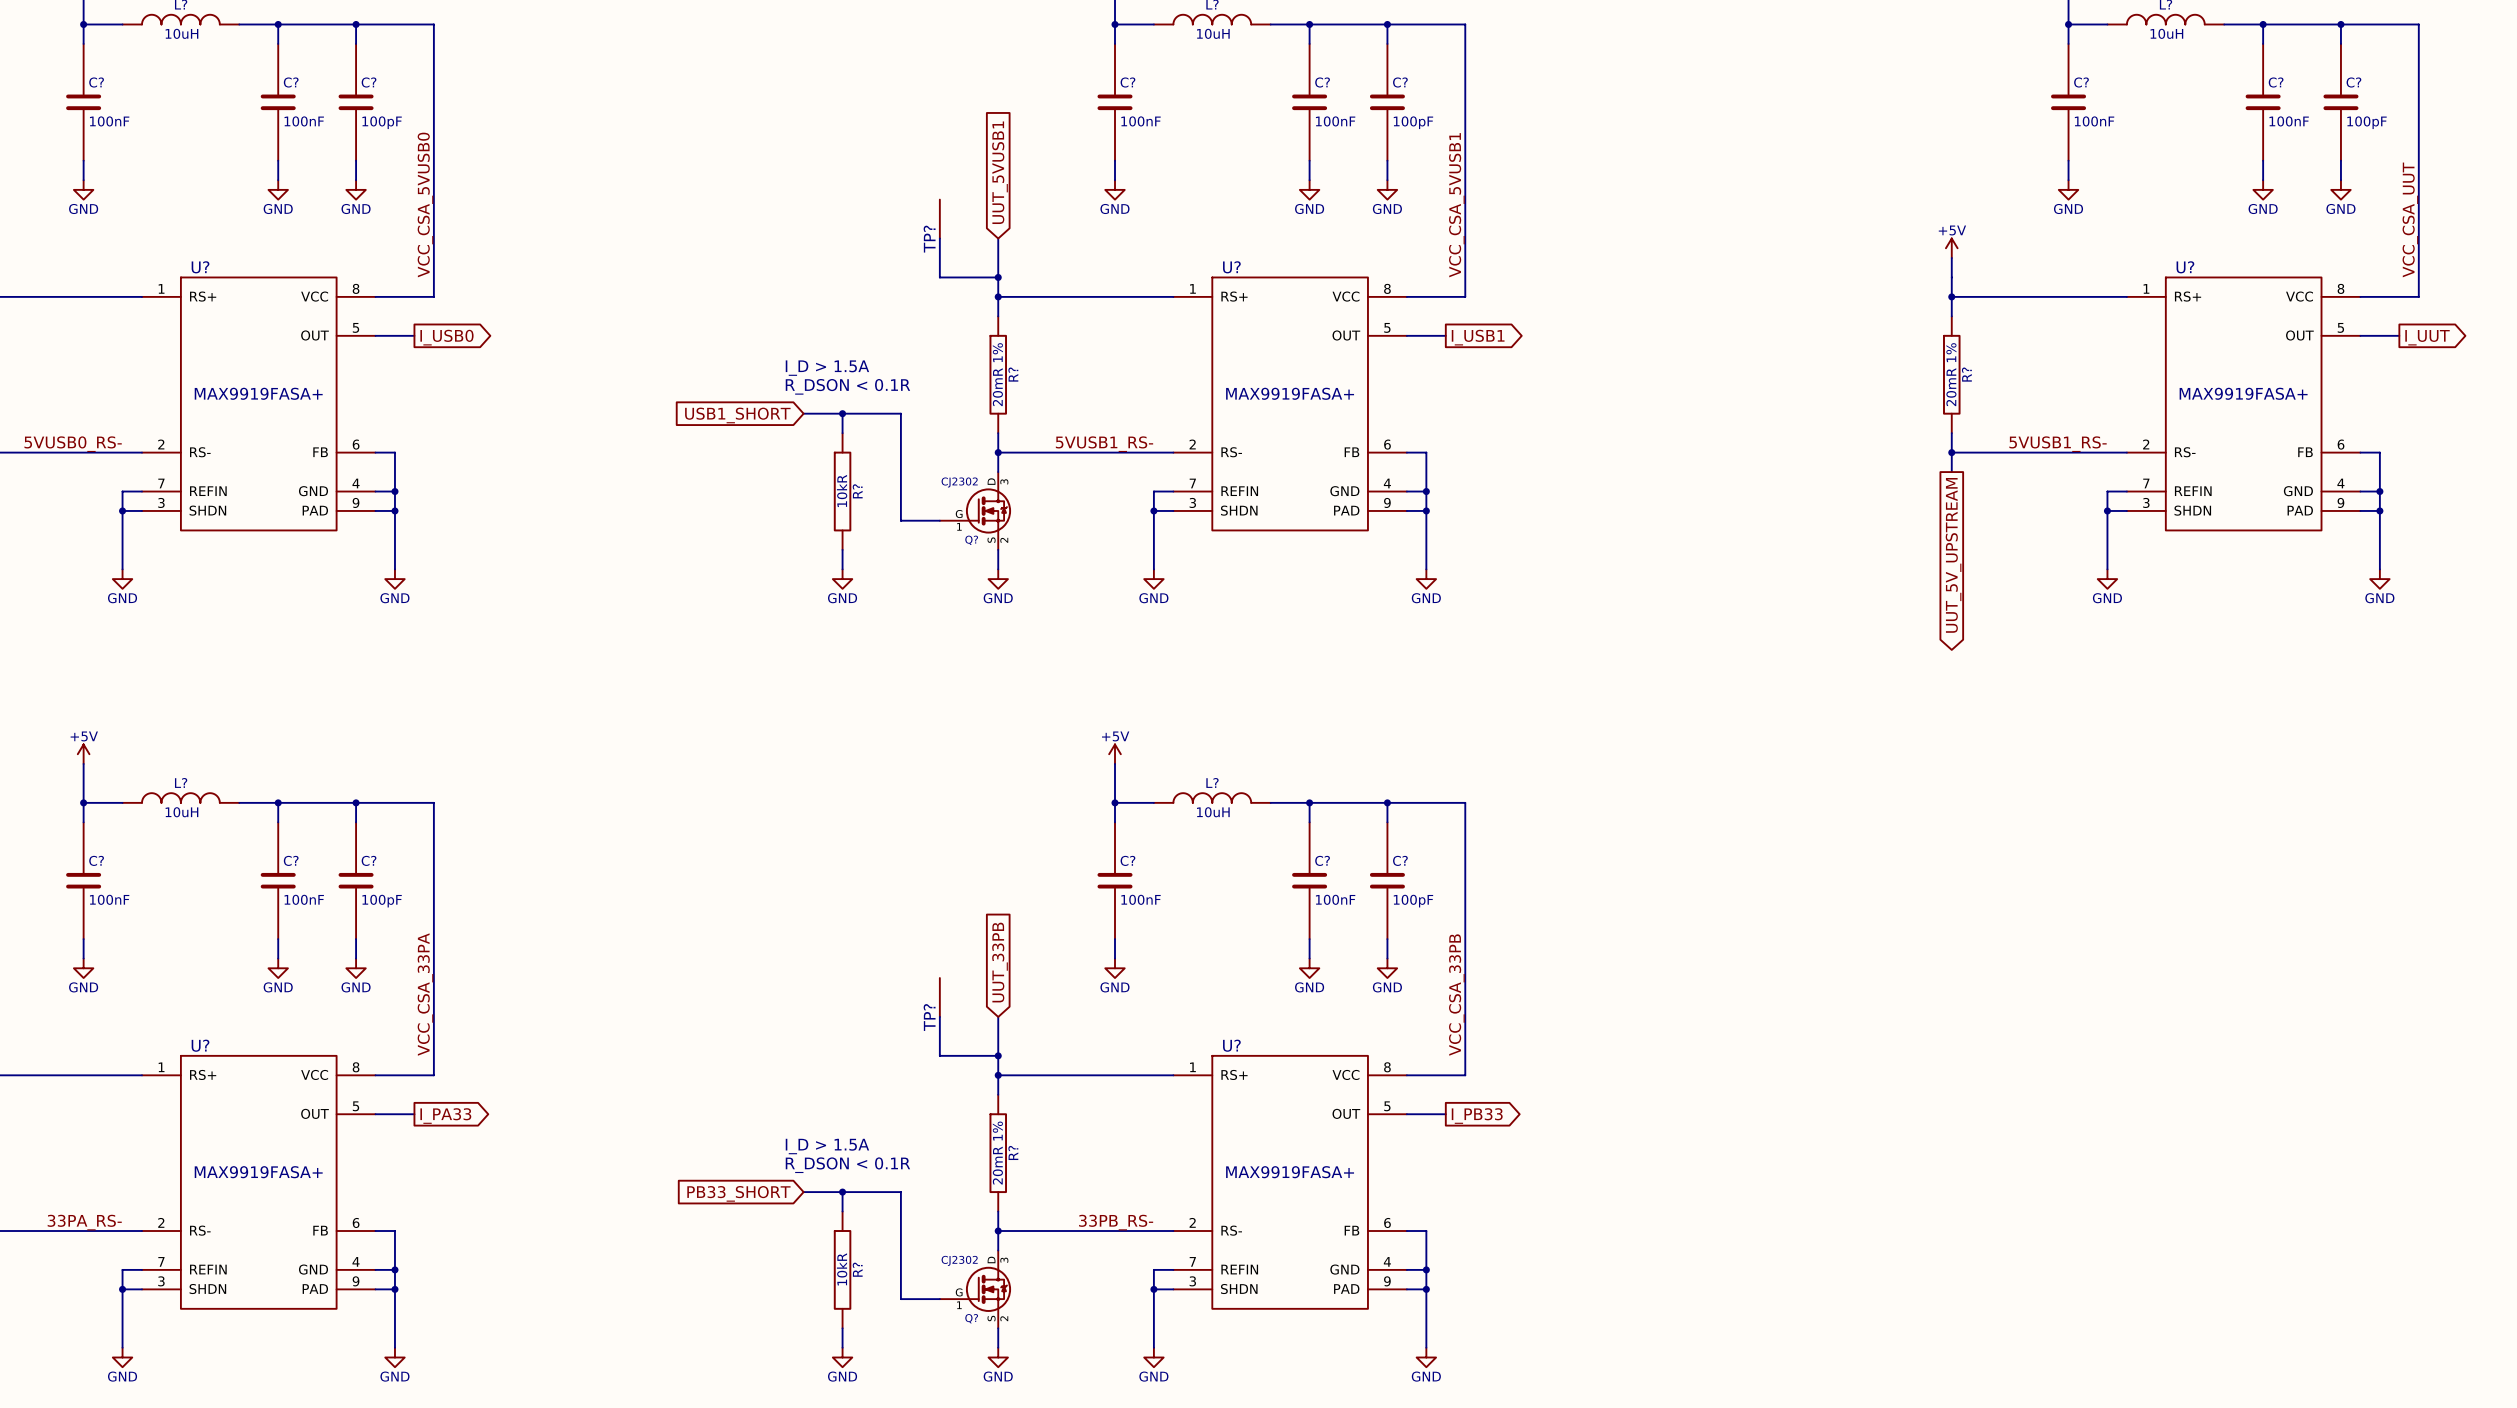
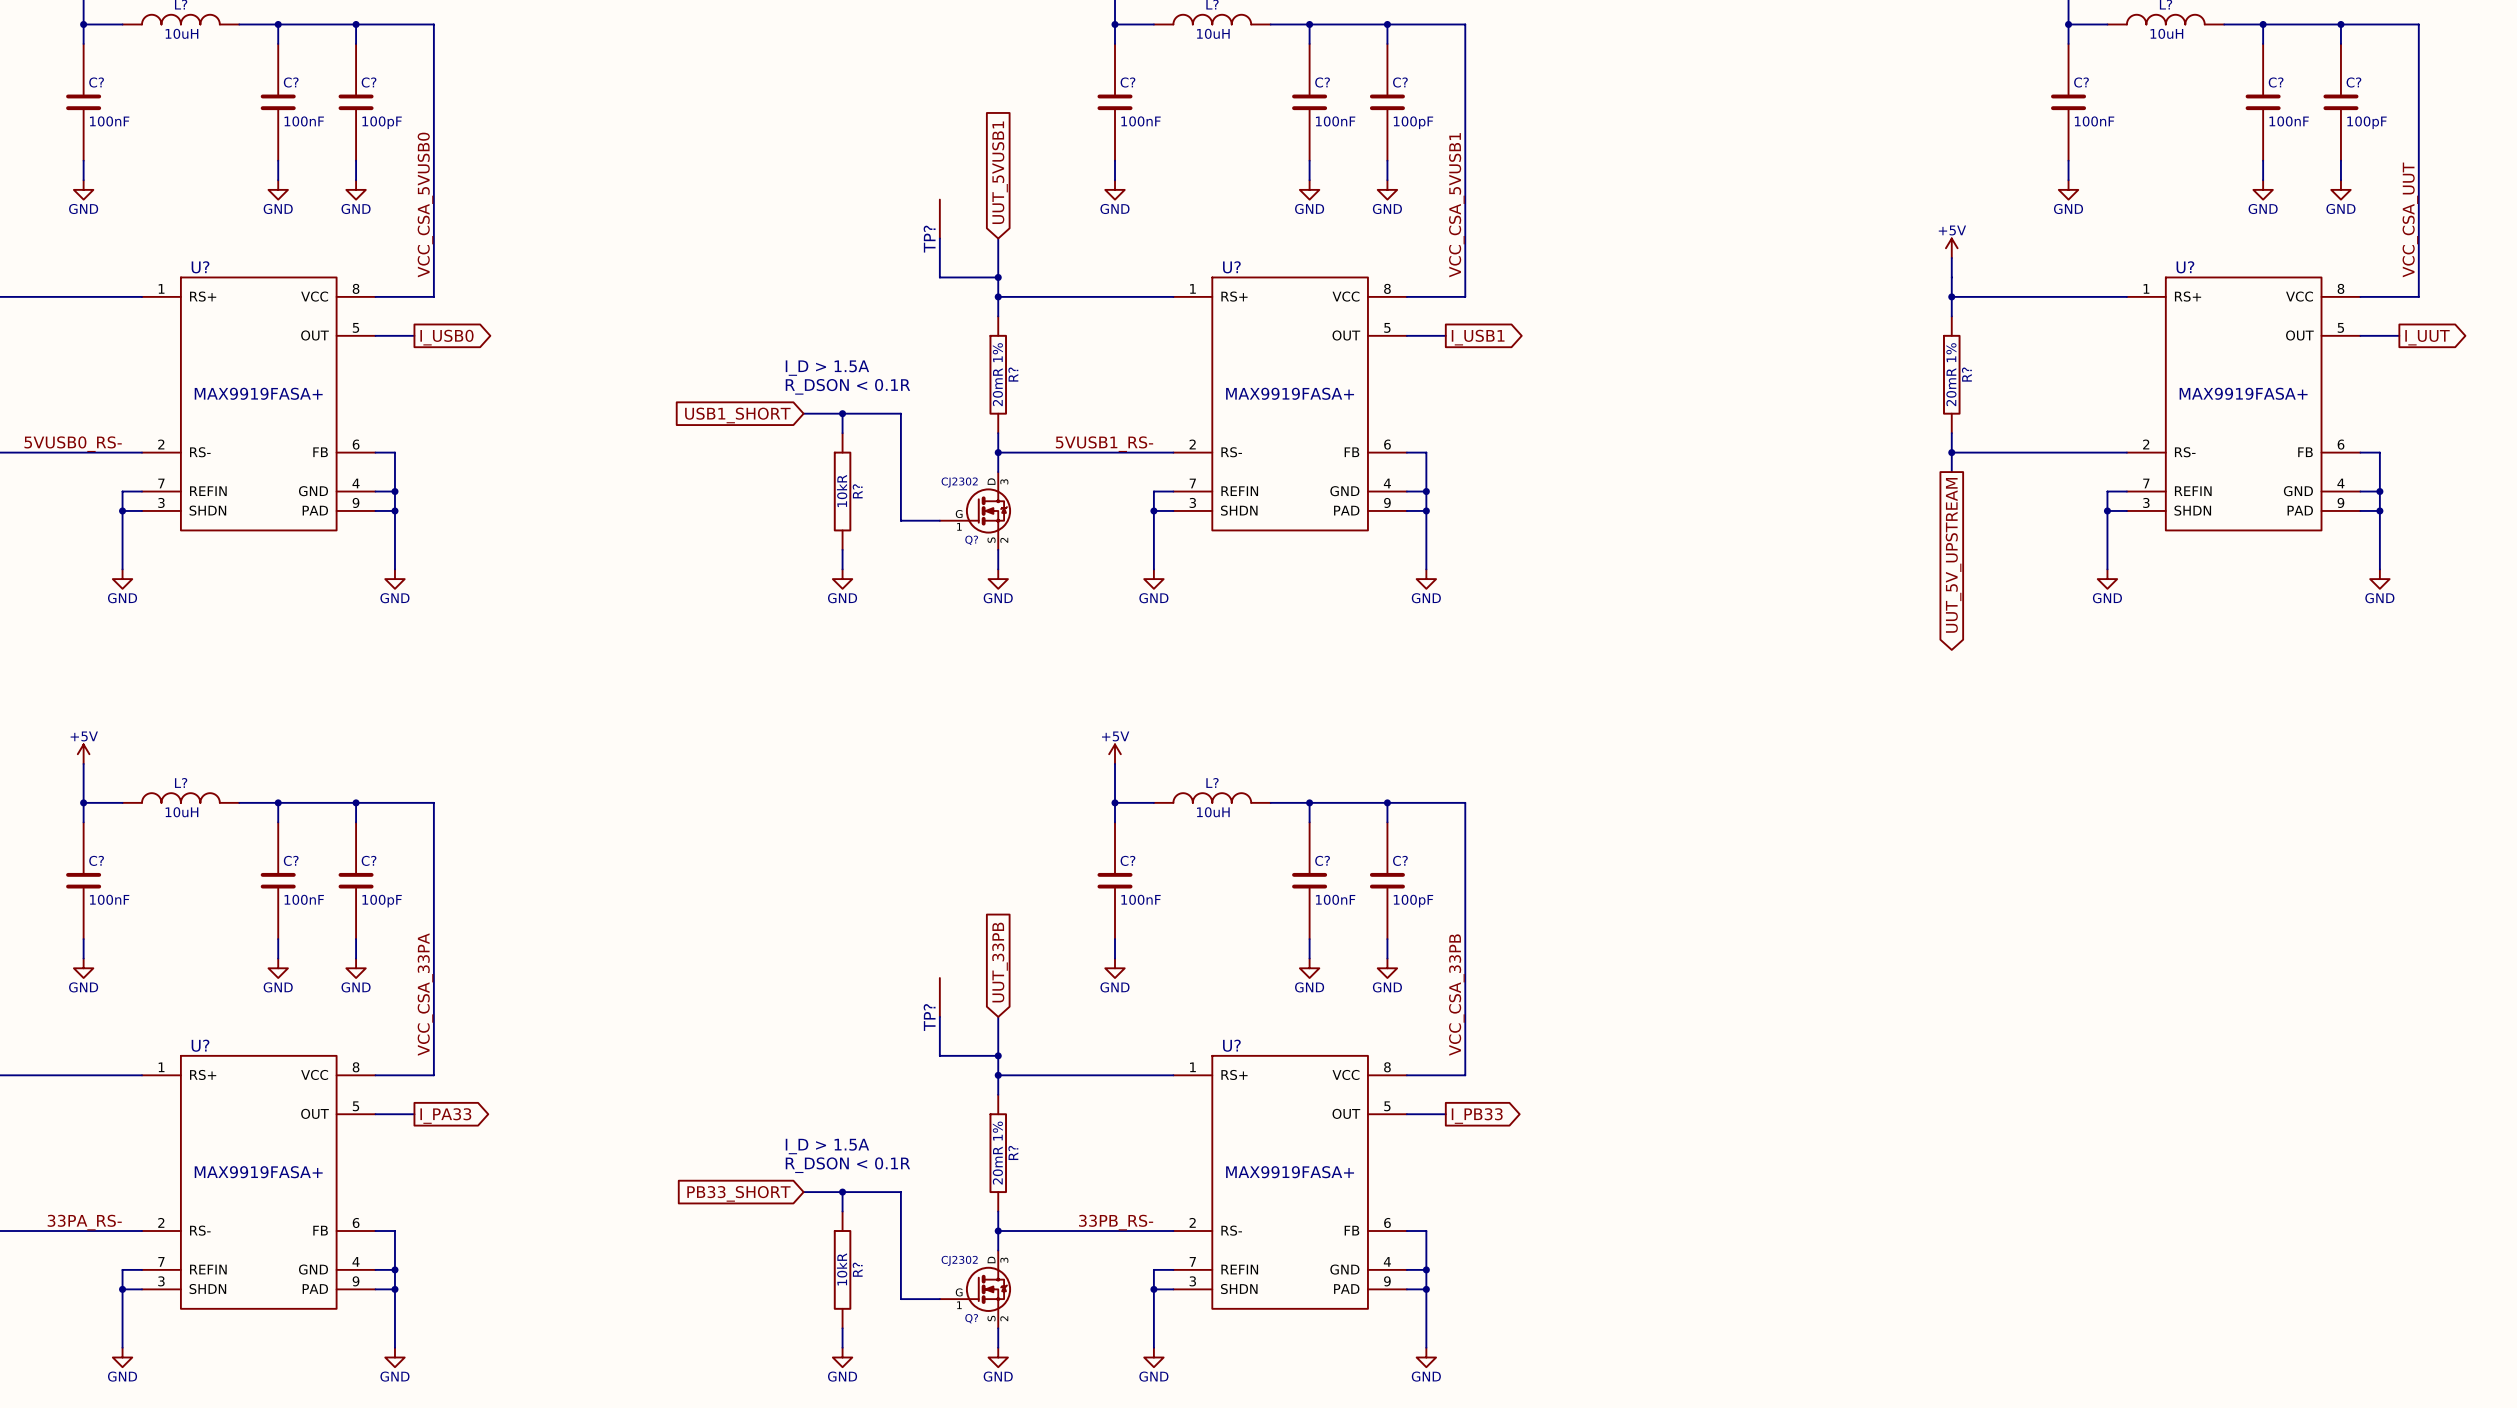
label: 5VUSB1_RS- (2058, 444) -> none

